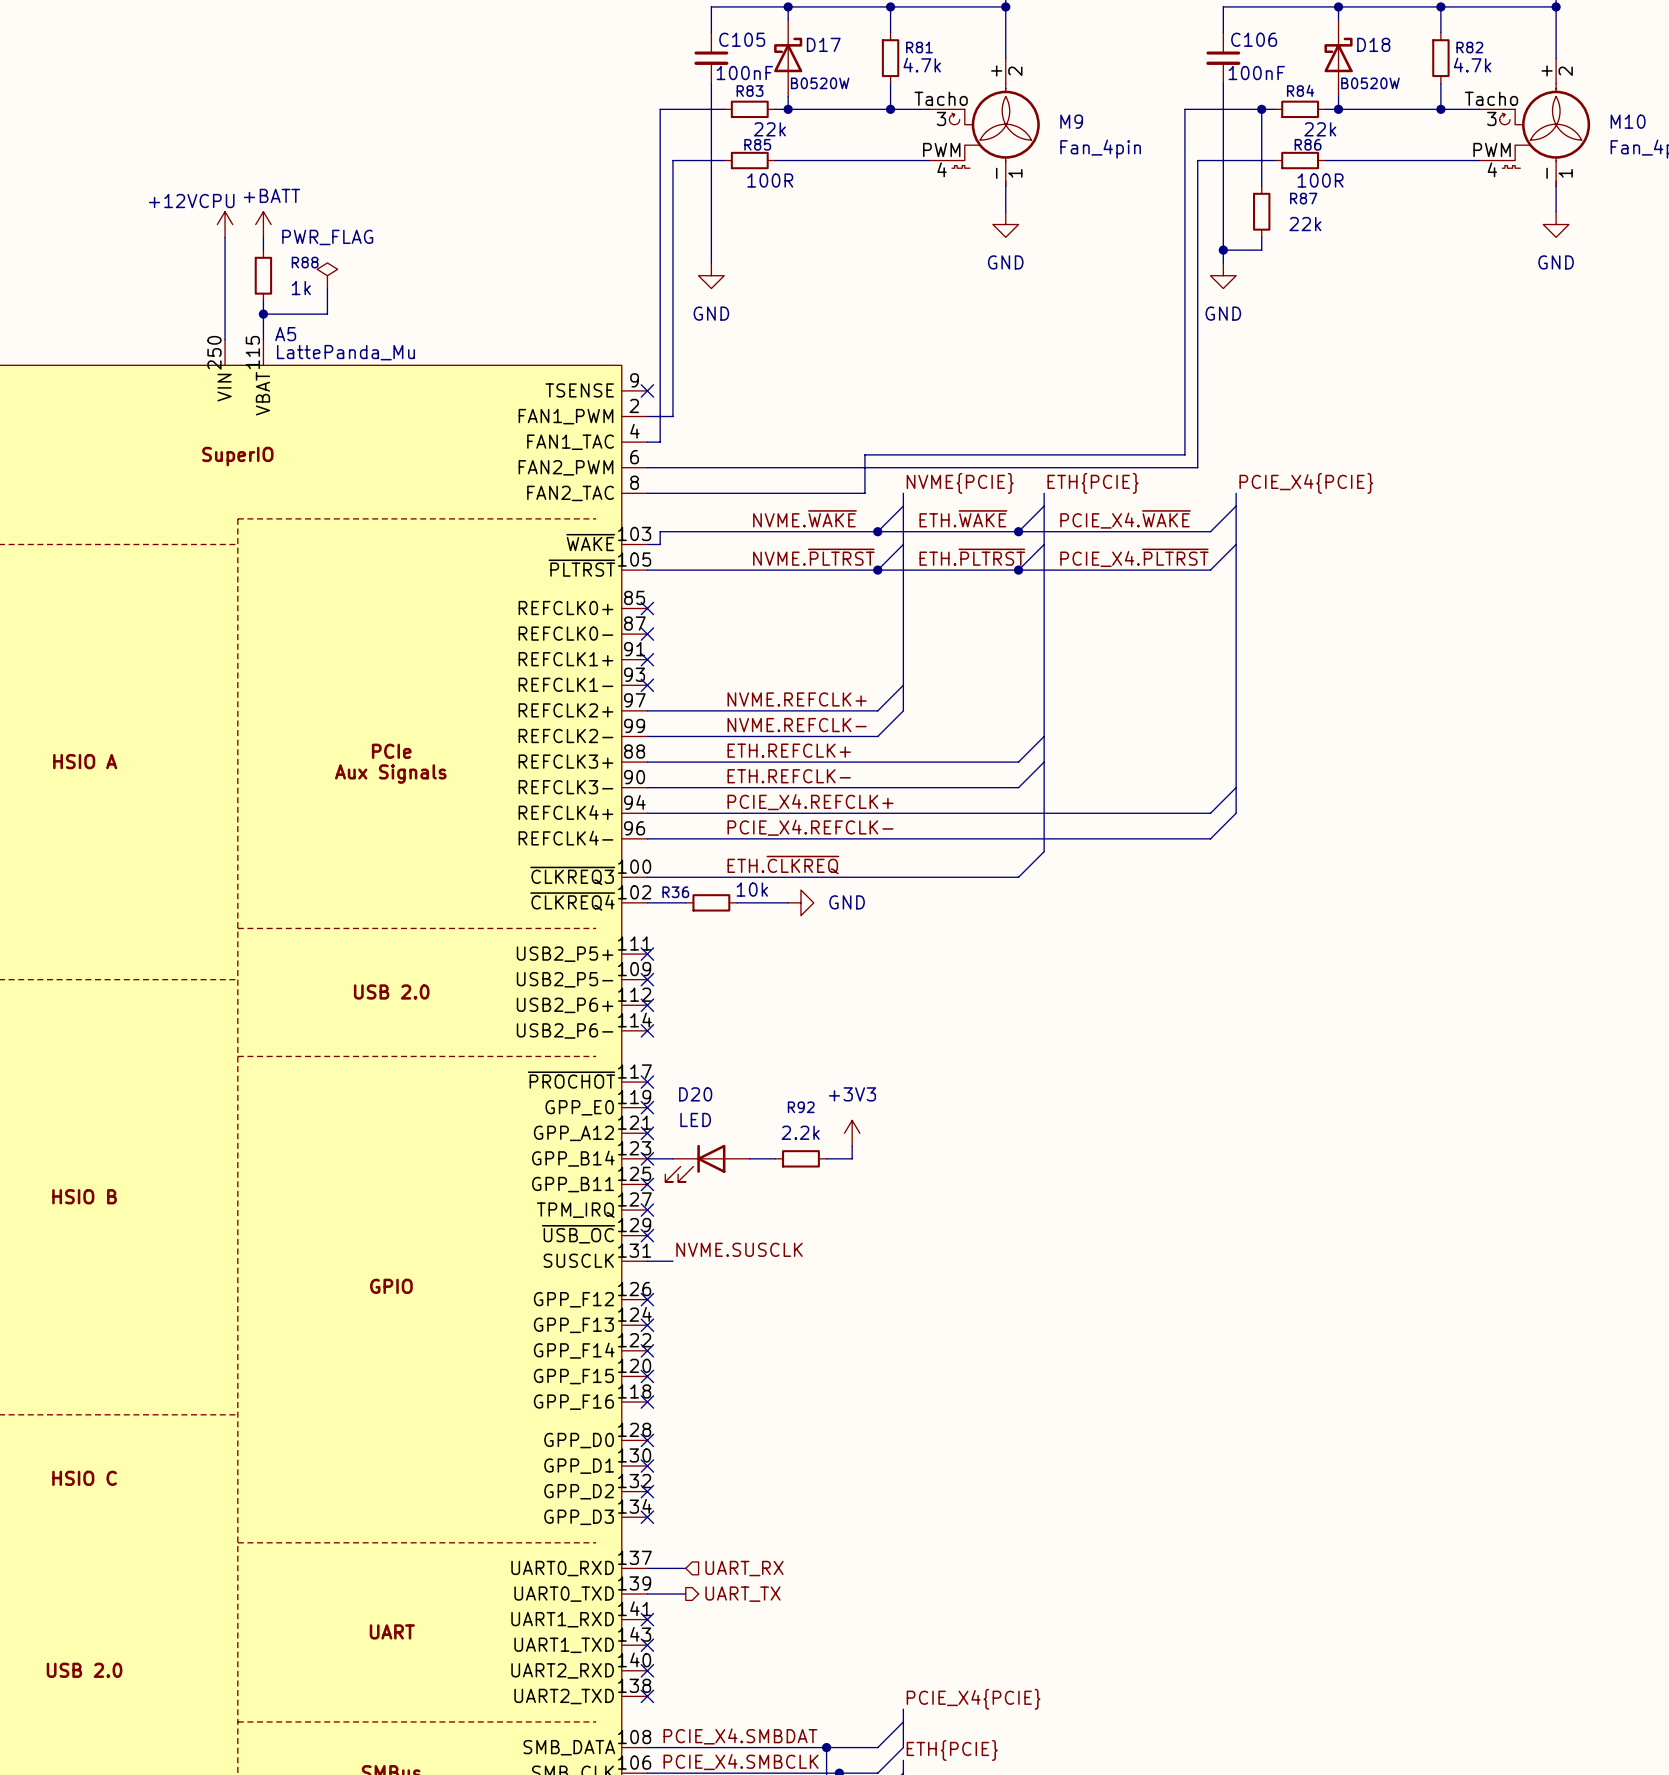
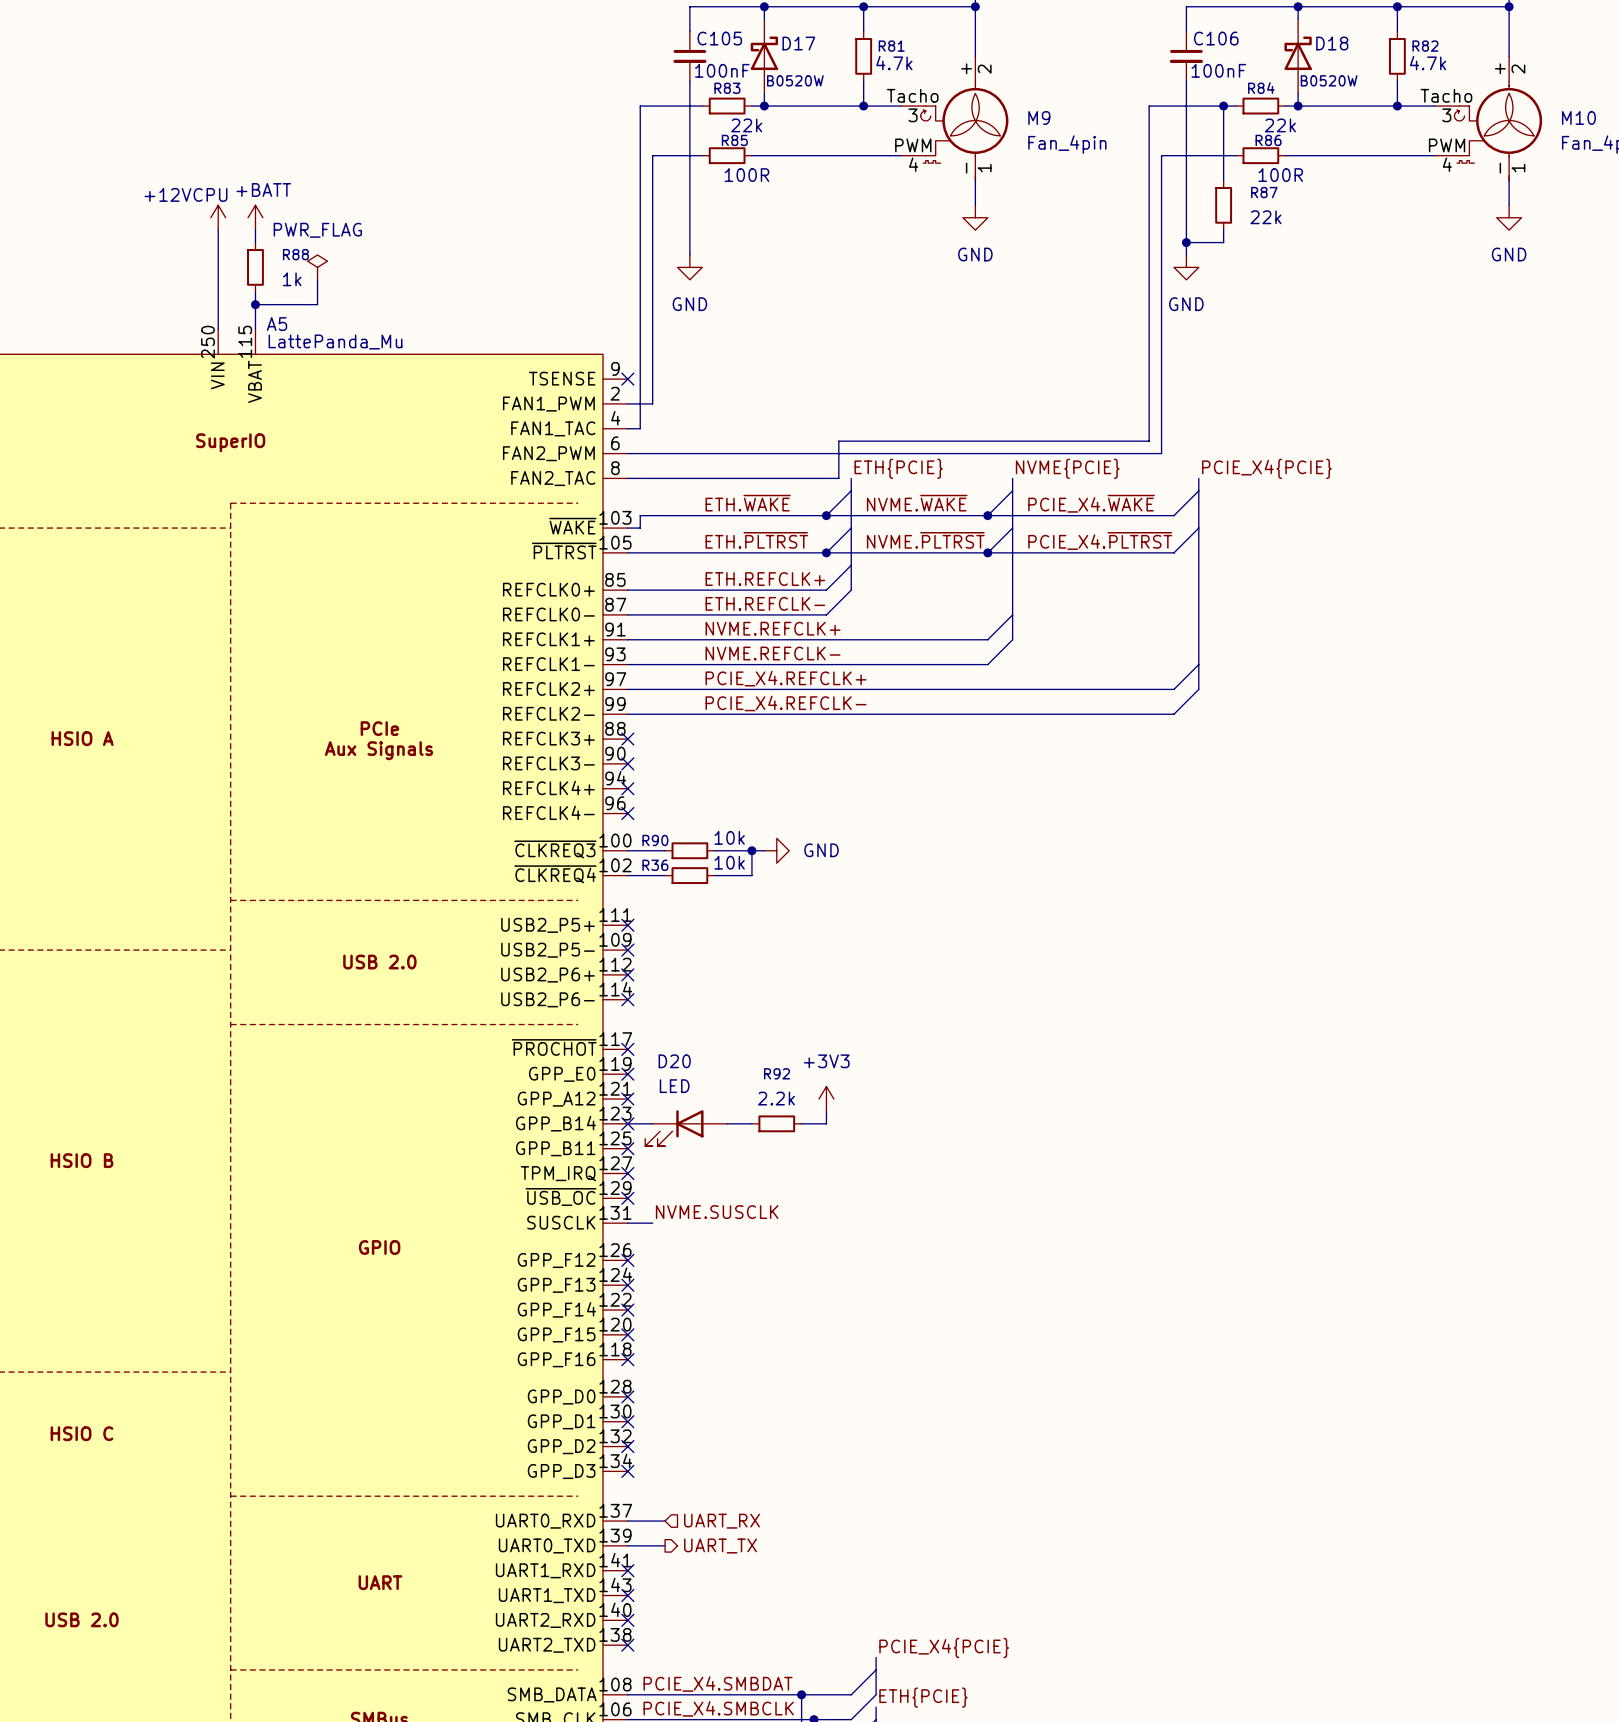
label: NVME{PCIE} (960, 483) -> ETH{PCIE} (898, 468)
label: ETH{PCIE} (1093, 483) -> NVME{PCIE} (1067, 468)
bus: none -> (851, 478) (851, 590)
bus: (903, 493) (903, 710) -> none
wire: (903, 506) (877, 531) -> (851, 490) (826, 515)
label position: NVME.~{WAKE} (805, 518) -> NVME.~{WAKE} (917, 503)
label position: ETH.~{WAKE} (963, 518) -> ETH.~{WAKE} (748, 503)
junction: none -> (826, 515)
junction: (877, 531) -> none
wire: (903, 544) (877, 570) -> (851, 528) (826, 552)
label position: NVME.~{PLTRST} (813, 557) -> NVME.~{PLTRST} (925, 540)
label position: ETH.~{PLTRST} (972, 557) -> ETH.~{PLTRST} (756, 540)
junction: none -> (826, 552)
junction: (877, 570) -> none
wire: none -> (851, 565) (826, 590) (627, 590)
no-connect mark: (647, 608) -> none
wire: none -> (851, 590) (826, 614) (627, 614)
no-connect mark: (647, 634) -> none
label: none -> NVME.REFCLK+ (773, 628)
no-connect mark: (647, 659) -> none
bus: (1044, 659) (1044, 851) -> none
label: none -> NVME.REFCLK- (773, 653)
no-connect mark: (647, 685) -> none
wire: (903, 685) (877, 710) -> (1198, 664) (1173, 689) (851, 689)
label: NVME.REFCLK+ (797, 699) -> PCIE_X4.REFCLK+ (786, 678)
wire: (903, 710) (877, 736) -> (1198, 689) (1173, 714) (851, 714)
bus: (1236, 710) (1236, 813) -> none
label: NVME.REFCLK- (797, 725) -> PCIE_X4.REFCLK- (786, 703)
wire: (1044, 736) (1018, 762) (647, 762) -> (1012, 614) (987, 639) (627, 639)
label position: ETH.REFCLK+ (789, 750) -> ETH.REFCLK+ (765, 579)
no-connect mark: none -> (627, 739)
wire: (1044, 762) (1018, 787) (647, 787) -> (1012, 639) (987, 664) (627, 664)
label position: ETH.REFCLK- (789, 776) -> ETH.REFCLK- (765, 603)
no-connect mark: none -> (627, 763)
wire: (1236, 787) (1210, 813) (647, 813) -> none
label: PCIE_X4.REFCLK+ (810, 802) -> none
no-connect mark: none -> (627, 788)
wire: (1236, 813) (1210, 838) (647, 838) -> none
label: PCIE_X4.REFCLK- (810, 827) -> none
no-connect mark: none -> (627, 813)
wire: (1044, 851) (1018, 877) (788, 877) -> none
label: ETH.~{CLKREQ} (783, 864) -> none
wire: (685, 877) (736, 877) -> none
R90: none -> 10k (689, 850)
junction: none -> (751, 850)
wire: (775, 902) (788, 902) -> (751, 875) (751, 850)
power symbol position: GND (800, 902) -> GND (776, 850)

